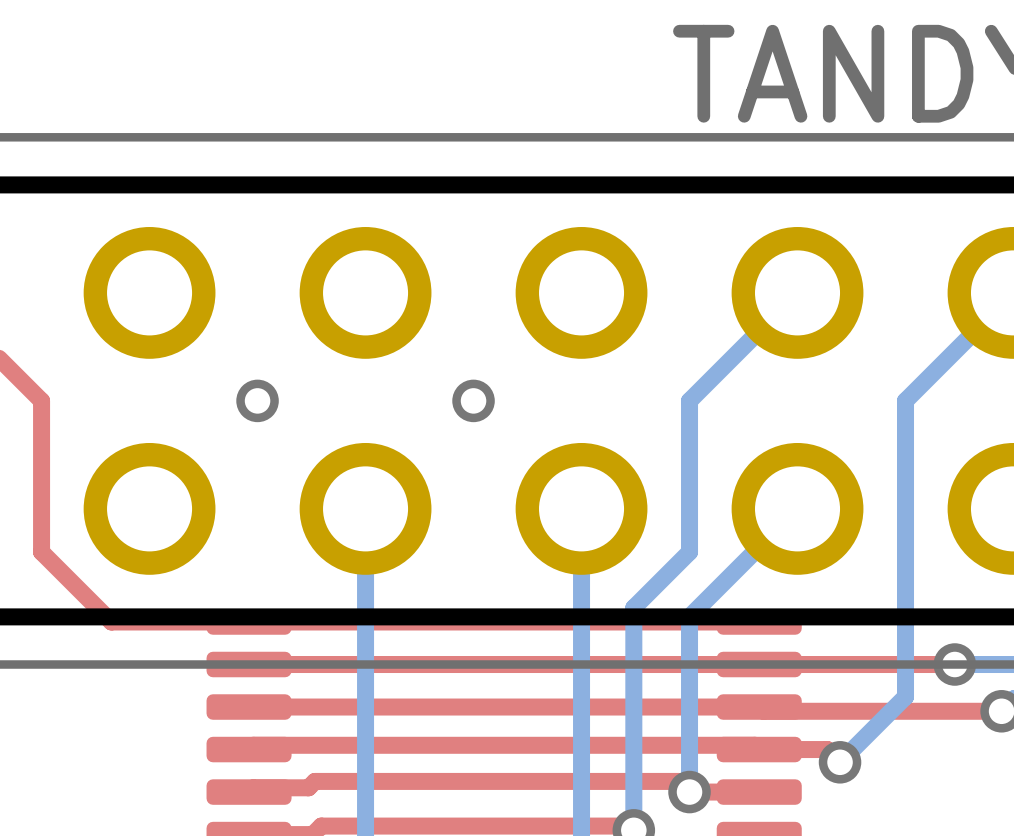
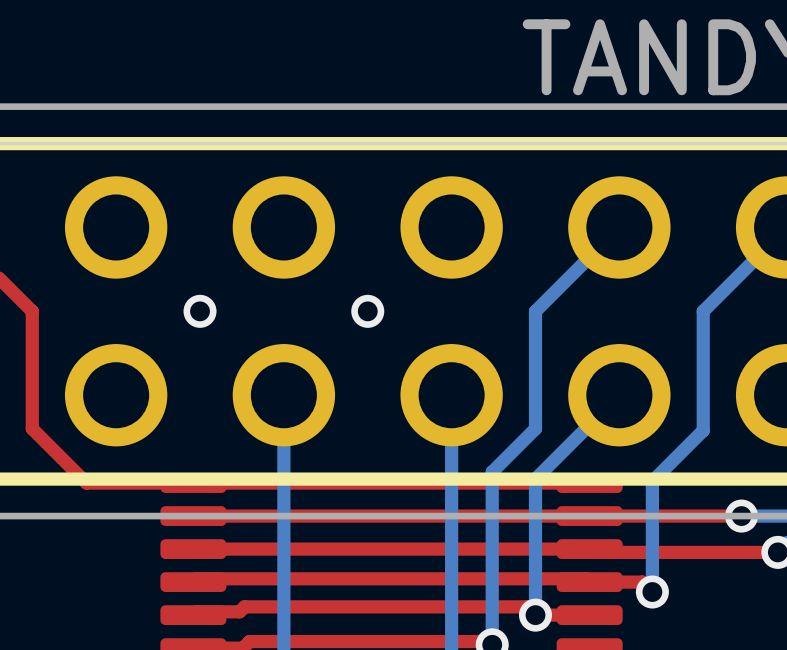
bottom track: (905, 554) (905, 696) (840, 762) -> (703, 430) (652, 481) (652, 592)

